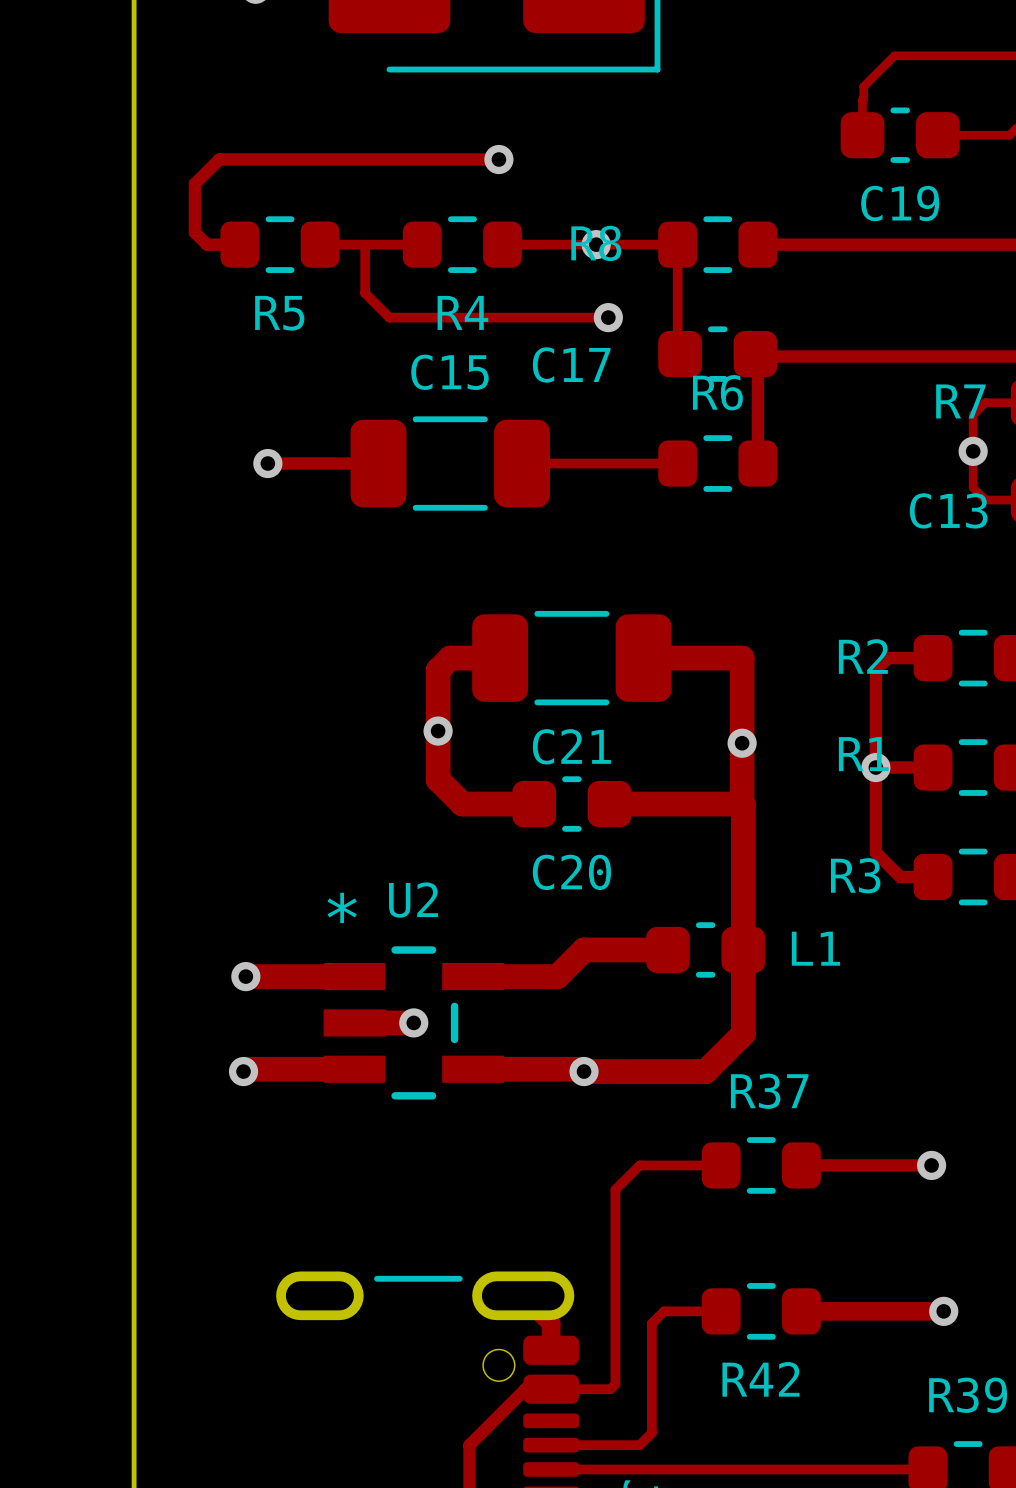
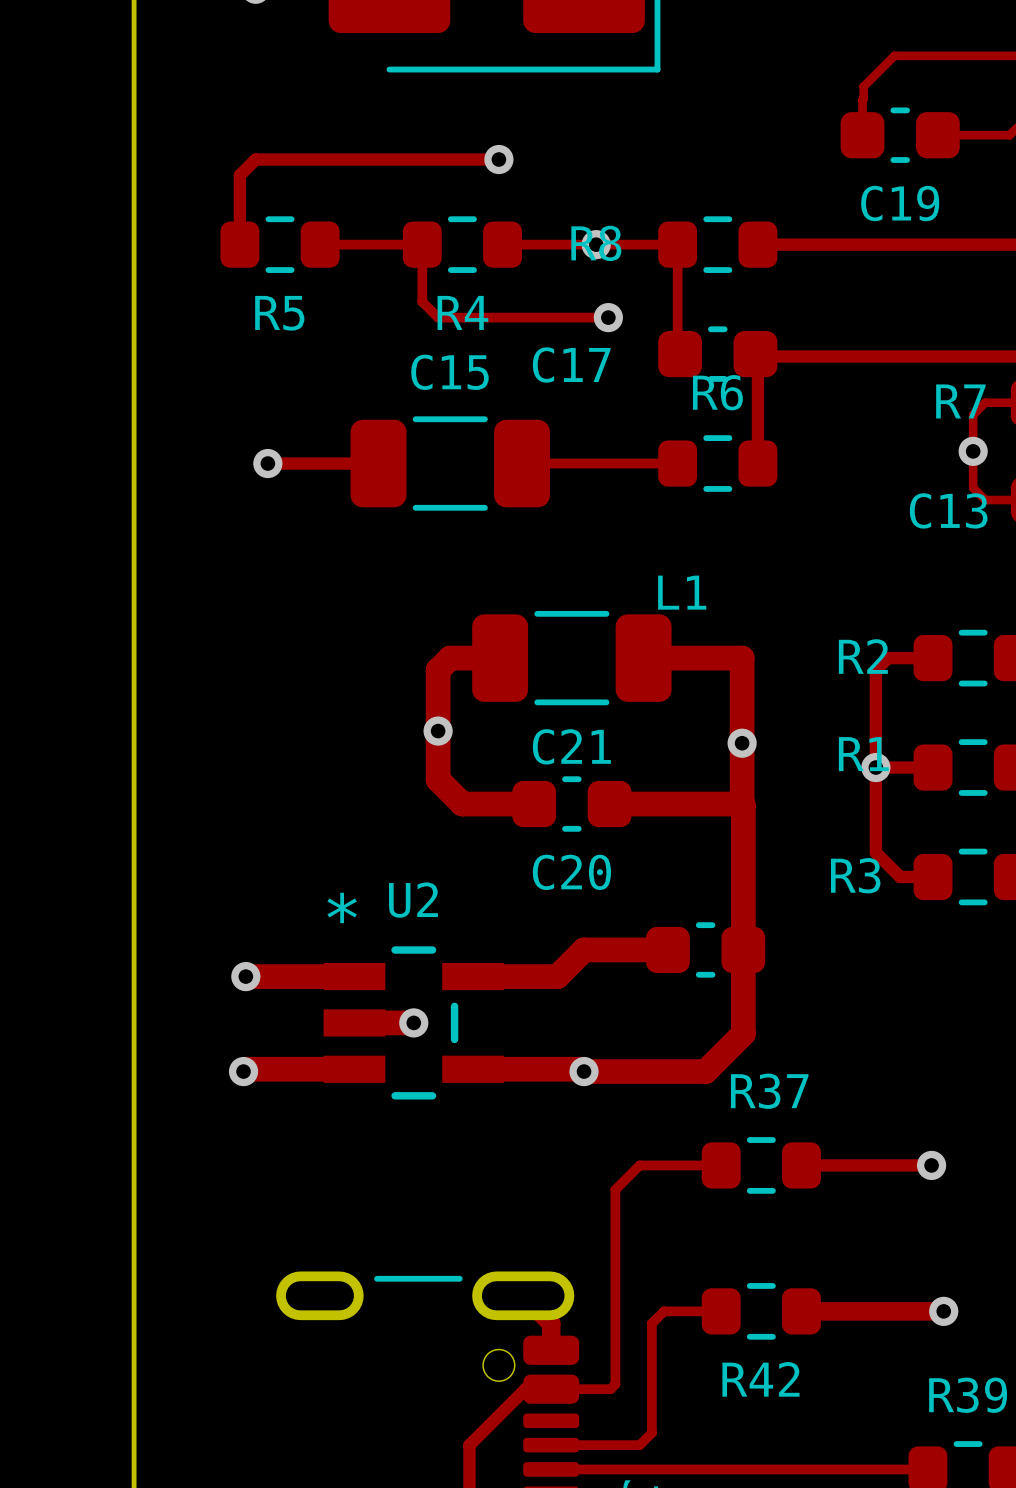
track: (255, 159) (219, 159) (194, 183) (194, 232) (207, 244) (239, 244) -> (255, 159) (239, 175) (239, 244)
track: (365, 244) (365, 293) (389, 317) (438, 317) -> (422, 244) (422, 301) (438, 317)
L1 name position: L1 (815, 948) -> L1 (682, 592)

